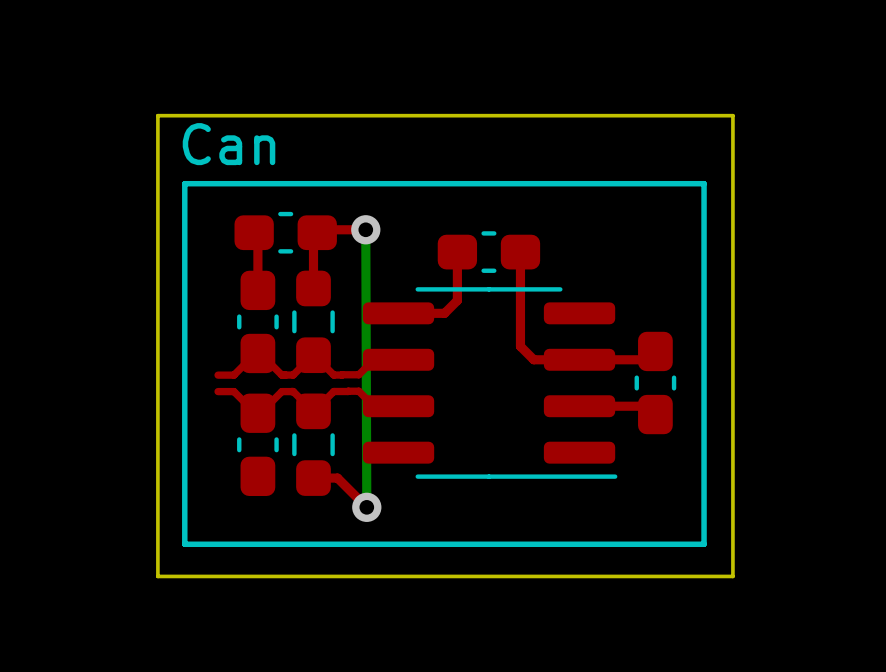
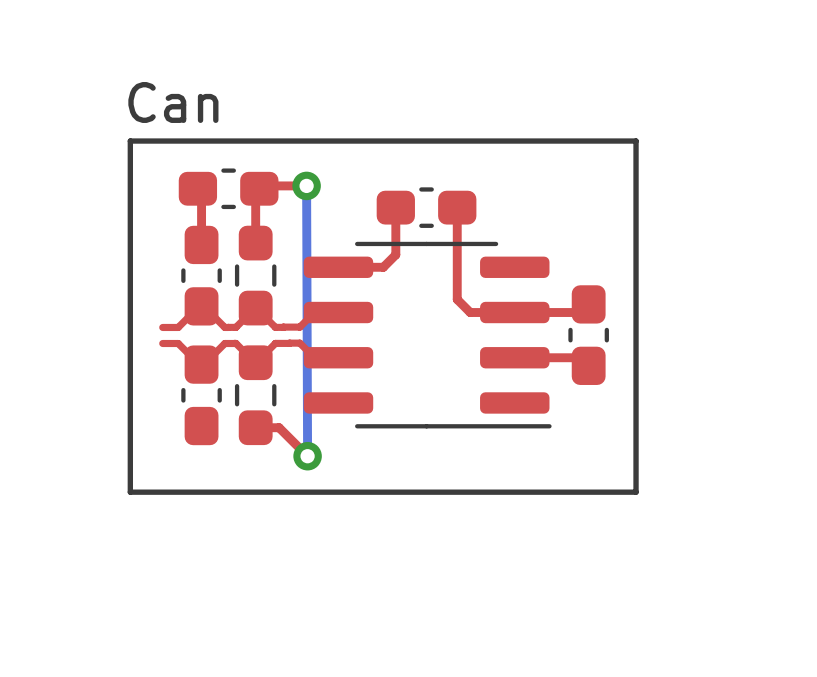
board edge: (157, 115) (732, 115) (732, 576) (157, 576) (157, 115) -> none

